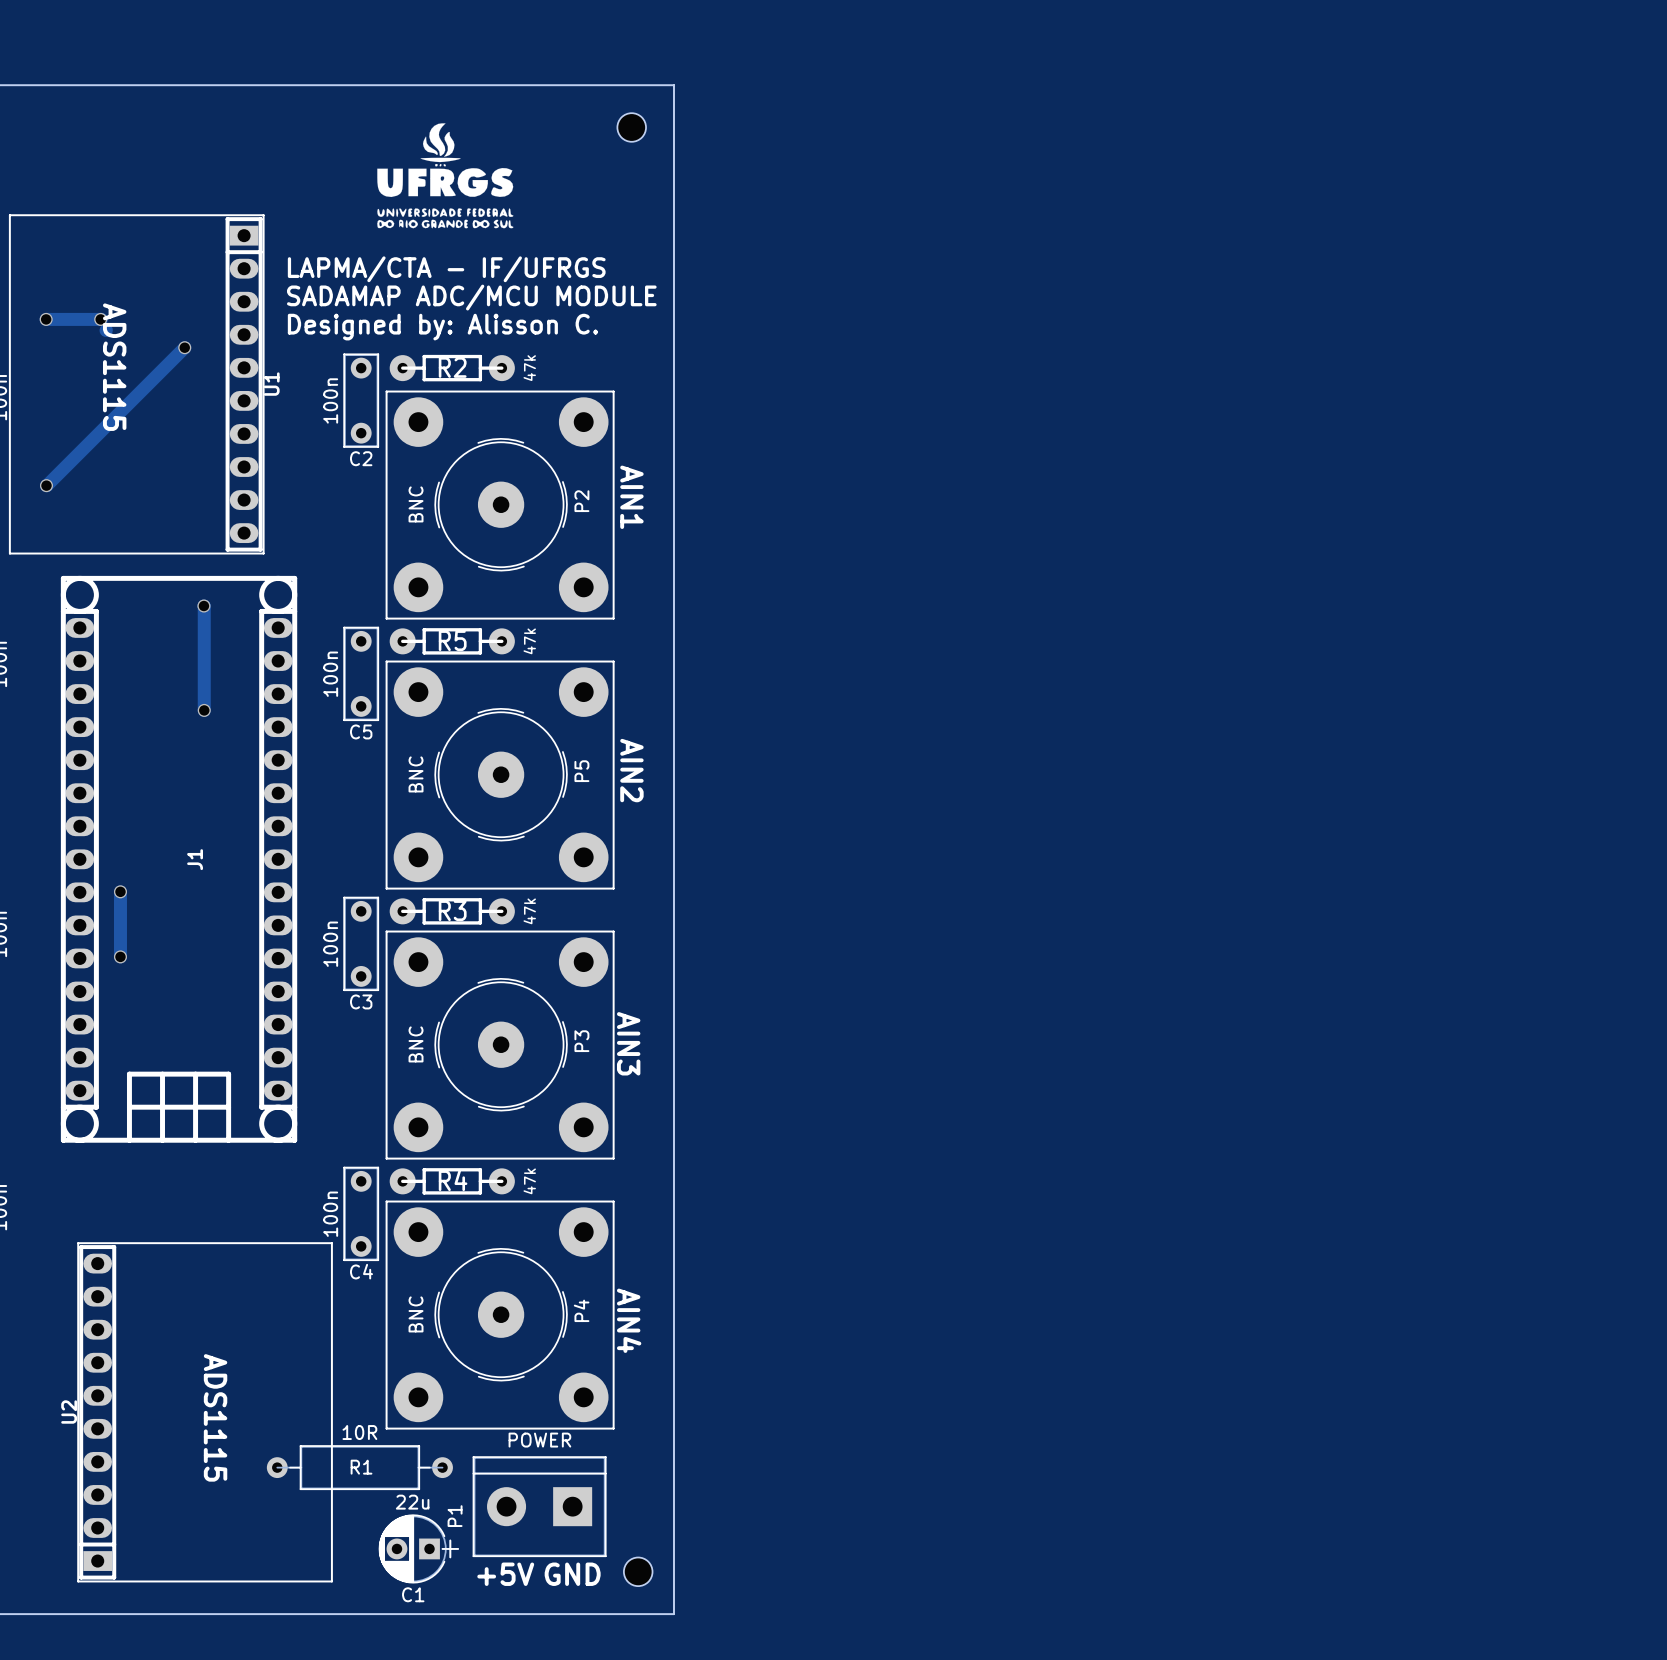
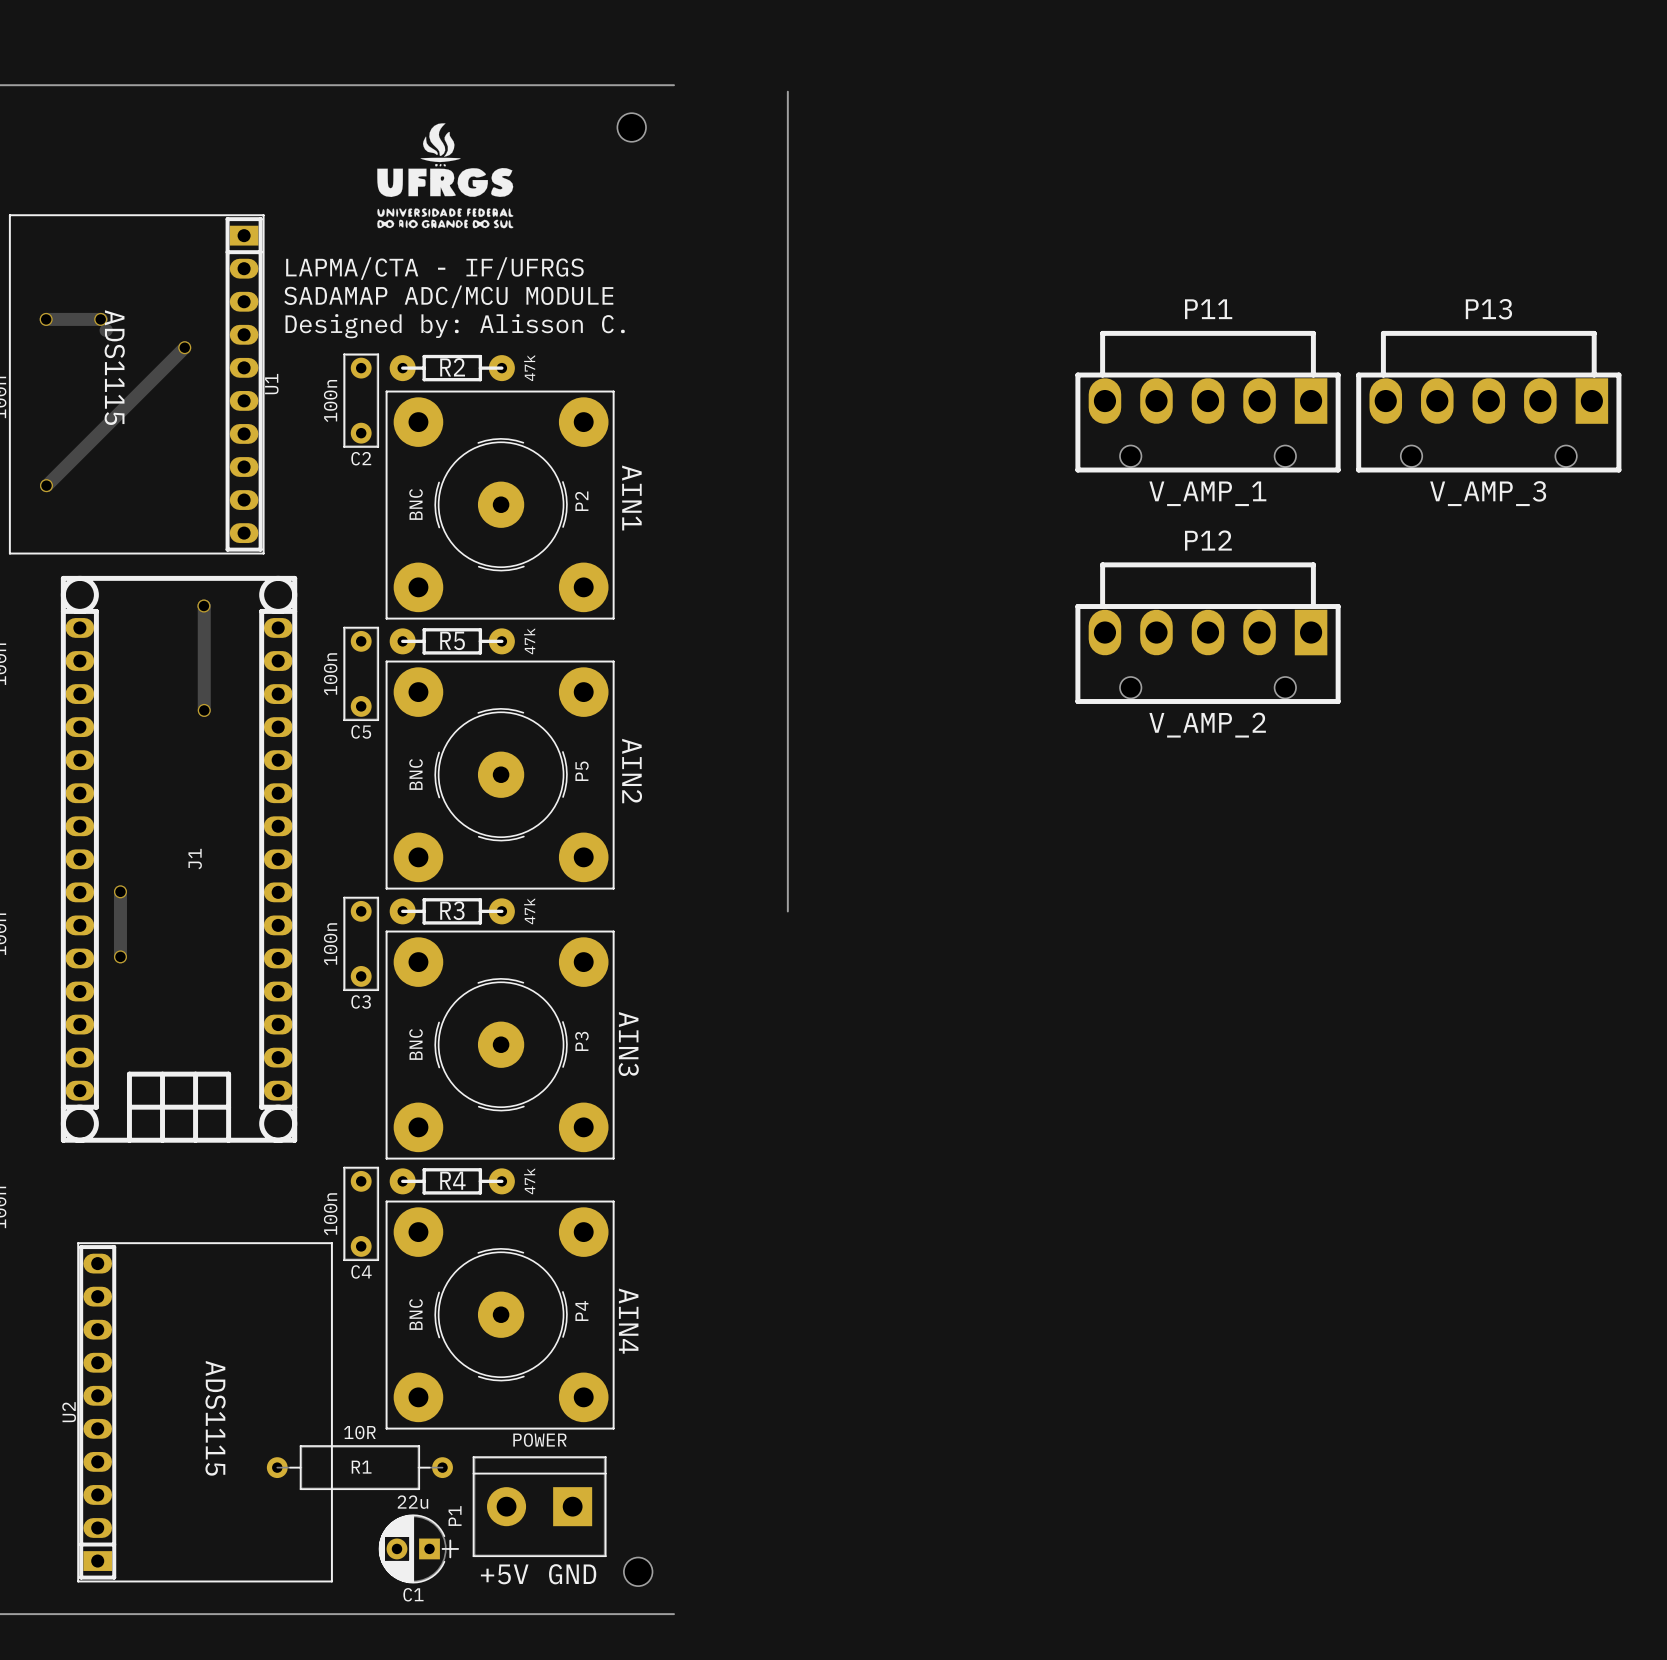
board edge: (673, 85) (673, 1614) -> none
board edge: none -> (787, 91) (787, 911)
P11: none -> V_AMP_1 (1208, 401)
P13: none -> V_AMP_3 (1488, 401)
P12: none -> V_AMP_2 (1208, 633)

